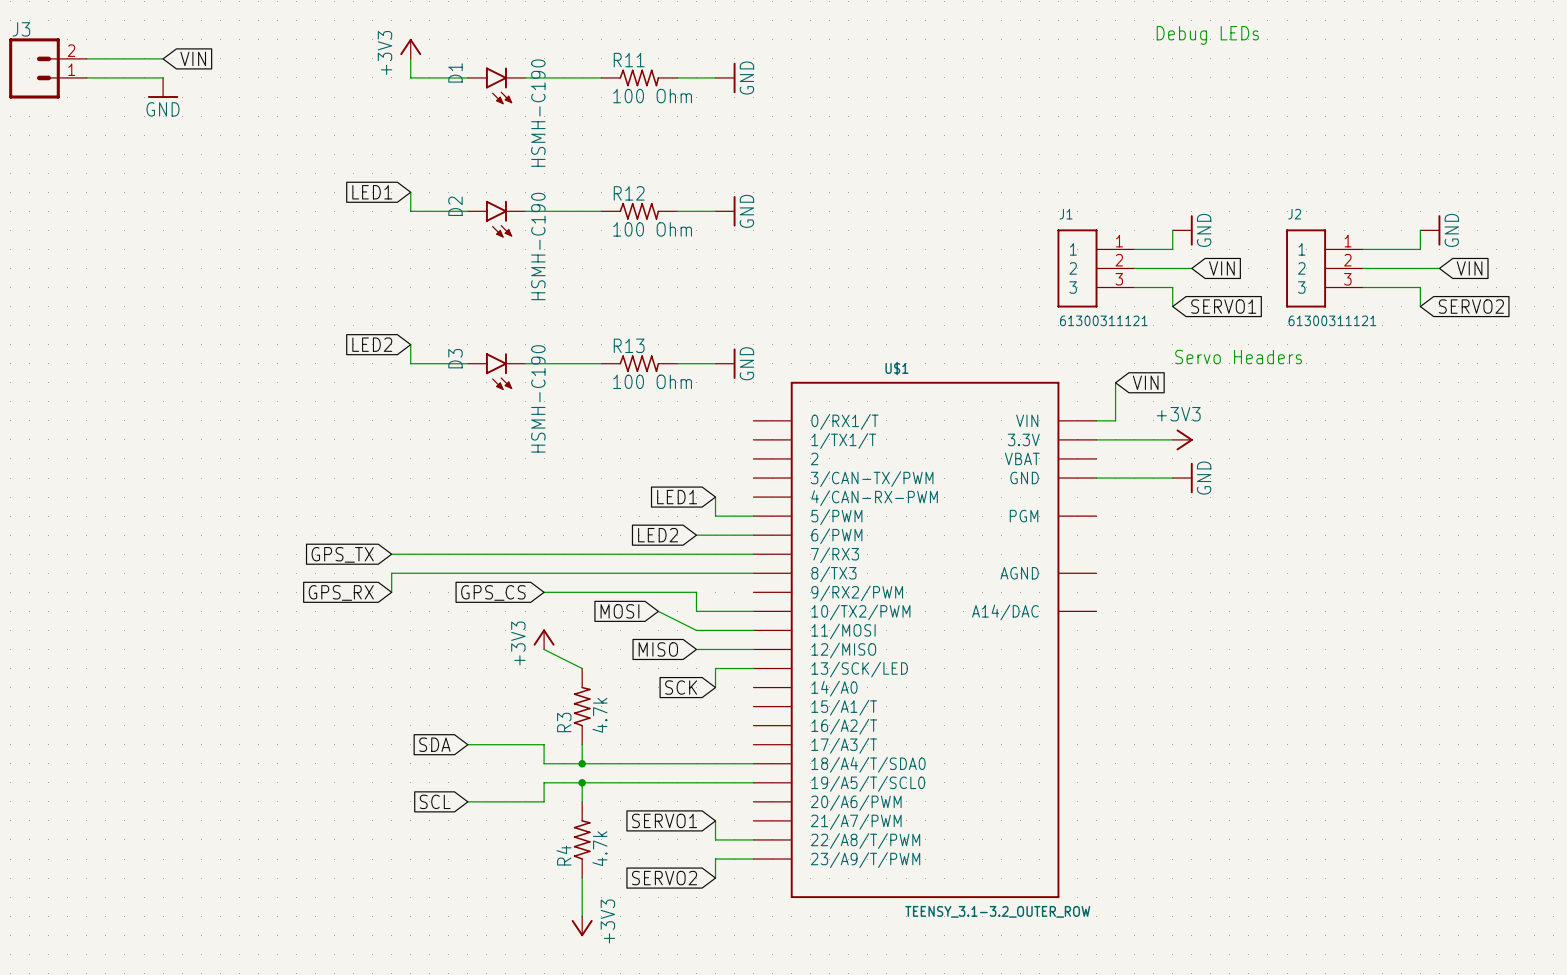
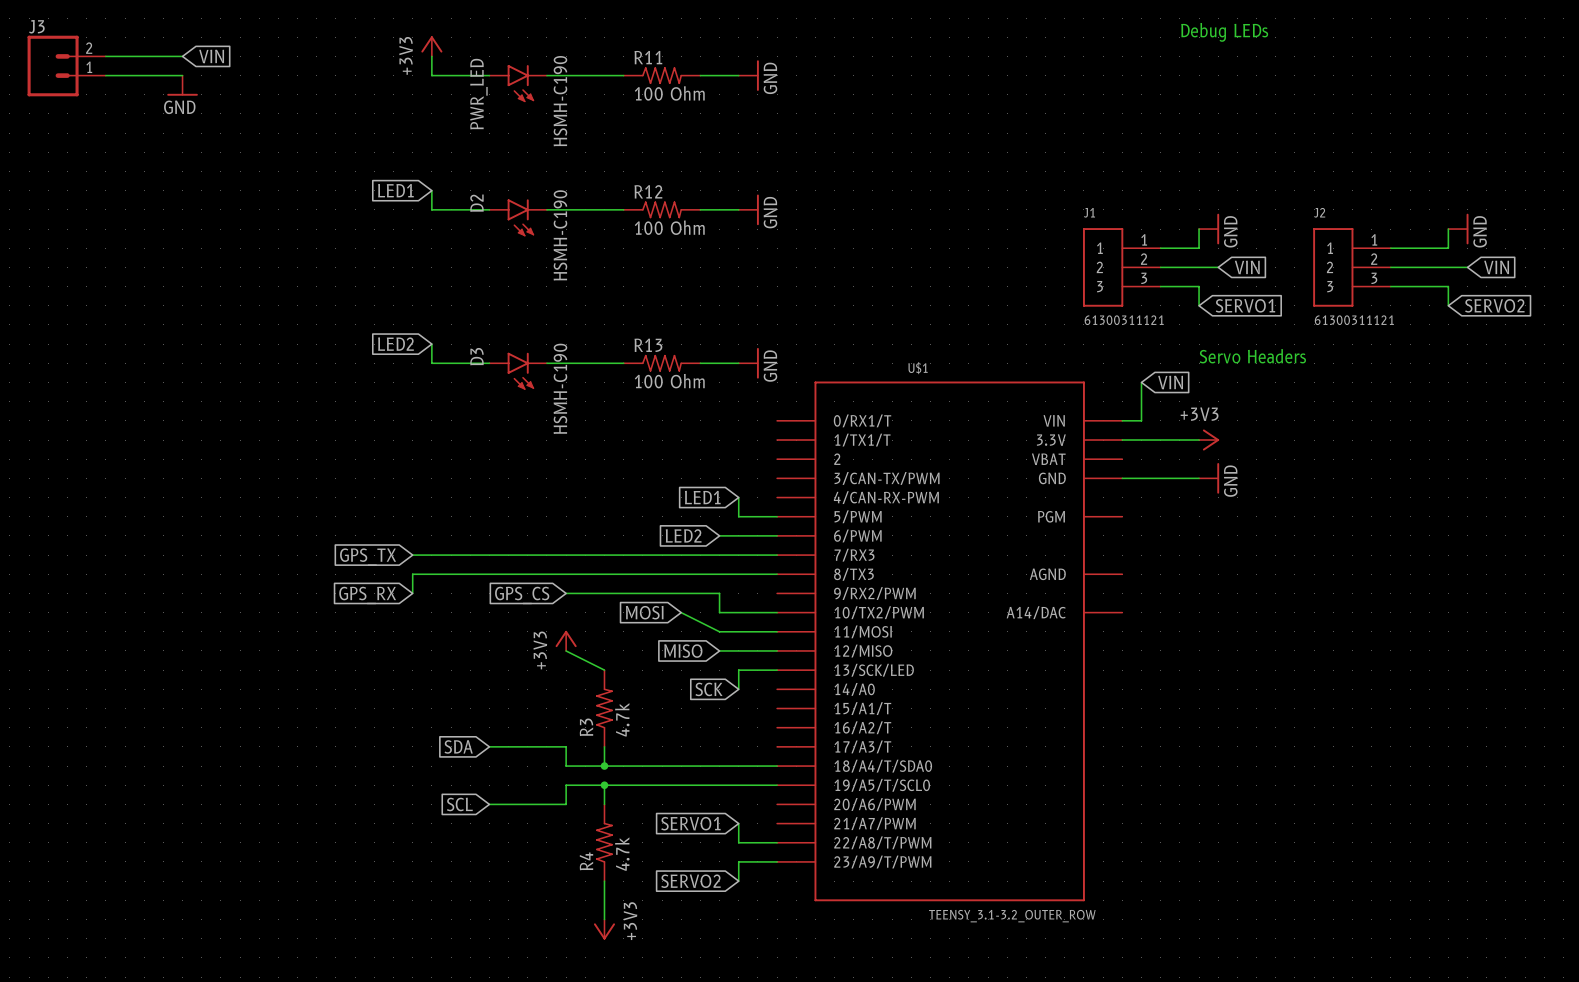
D1 name: D1 (455, 72) -> PWR_LED (478, 94)

